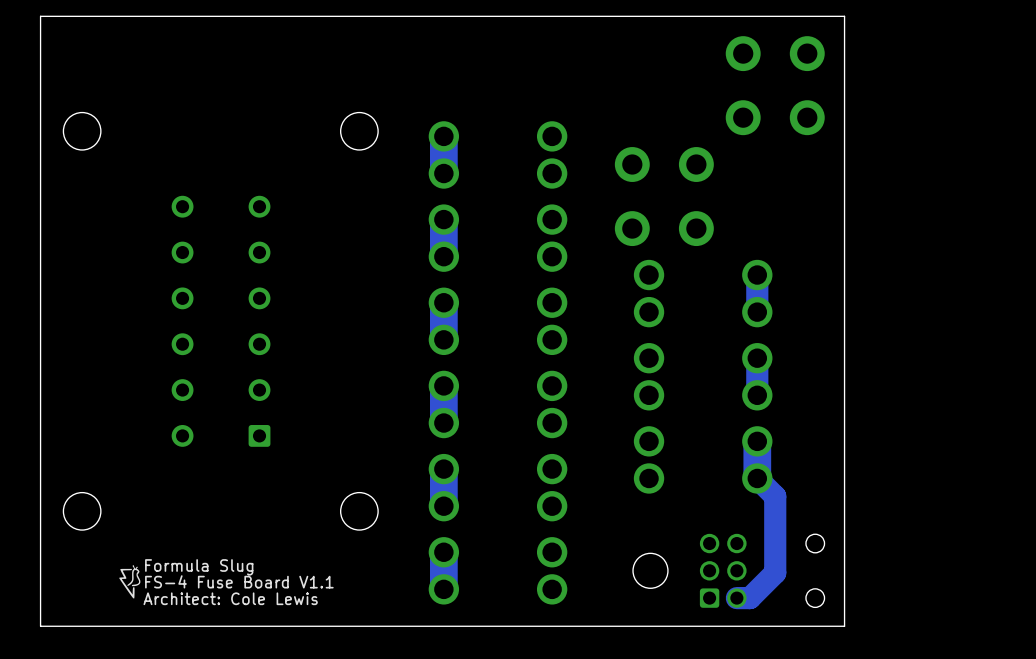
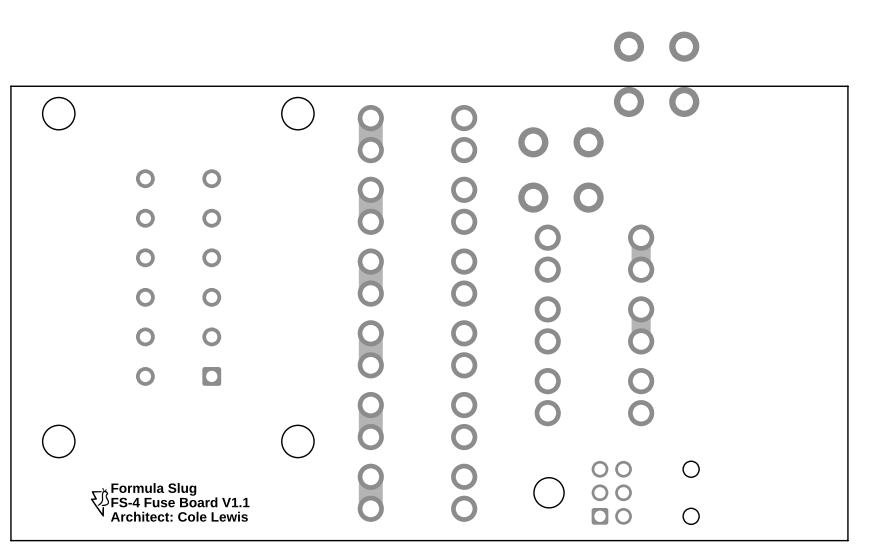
track: (757, 441) (757, 478) (775, 496) (775, 572) (749, 598) (736, 598) -> none
drawing shape: [119, 559, 334, 606] -> [90, 483, 250, 522]
board edge: (844, 626) (844, 16) (40, 16) (40, 626) -> (716, 540) (847, 540) (847, 86) (10, 86) (10, 540) (22, 540)

